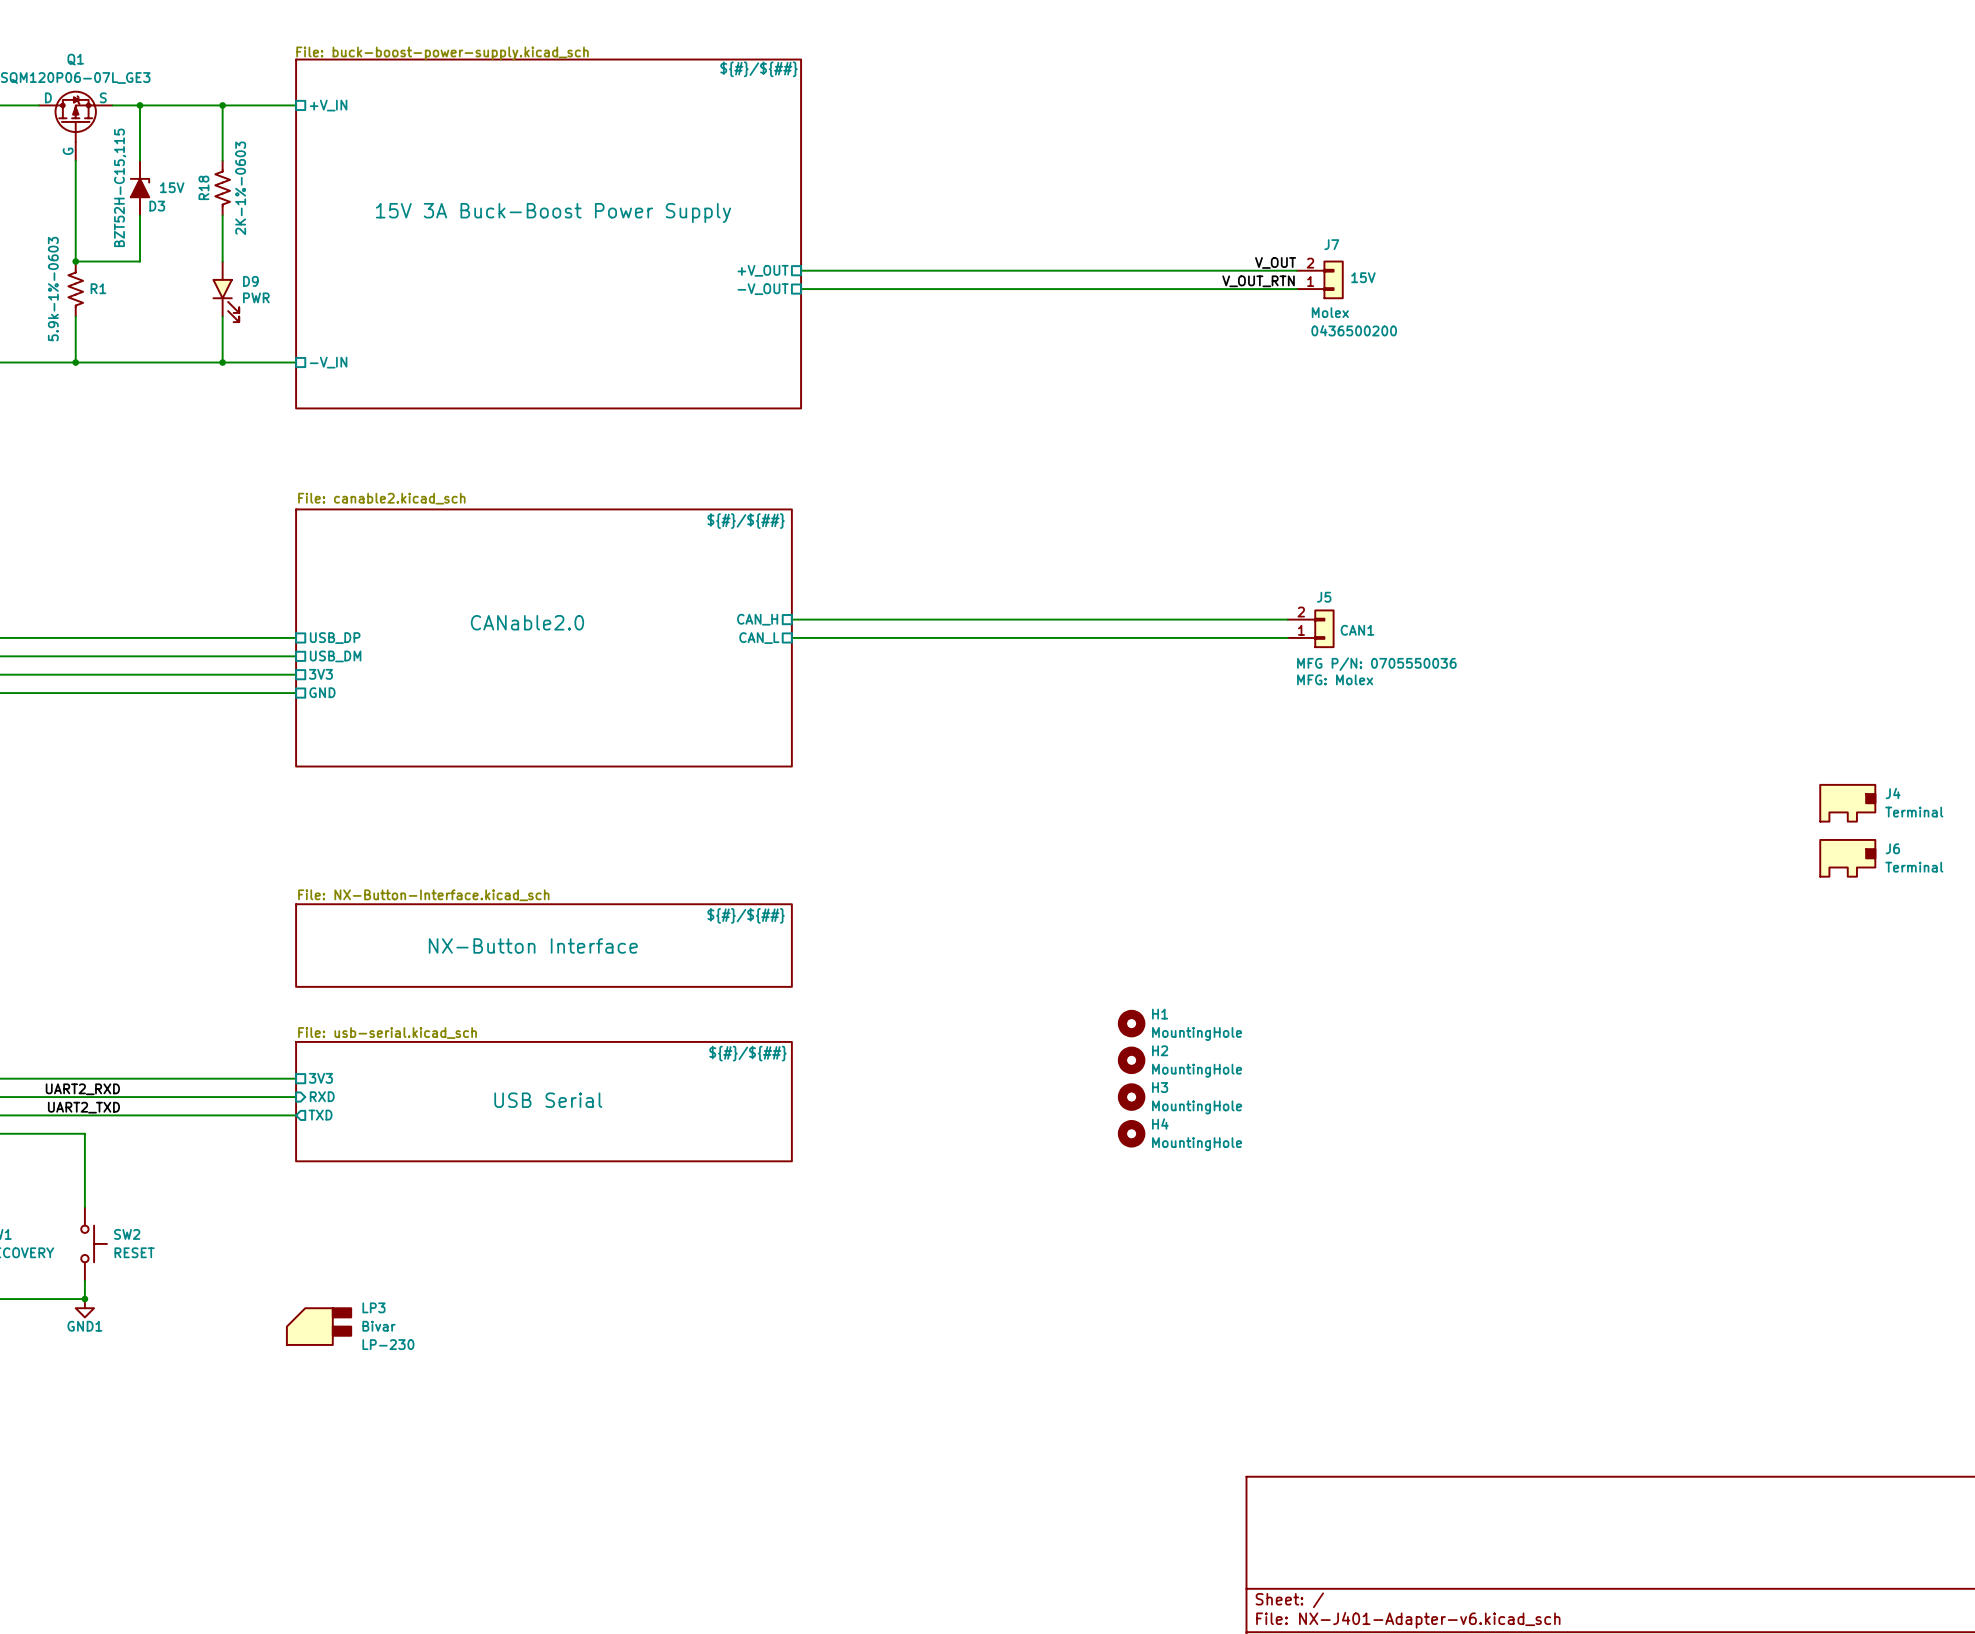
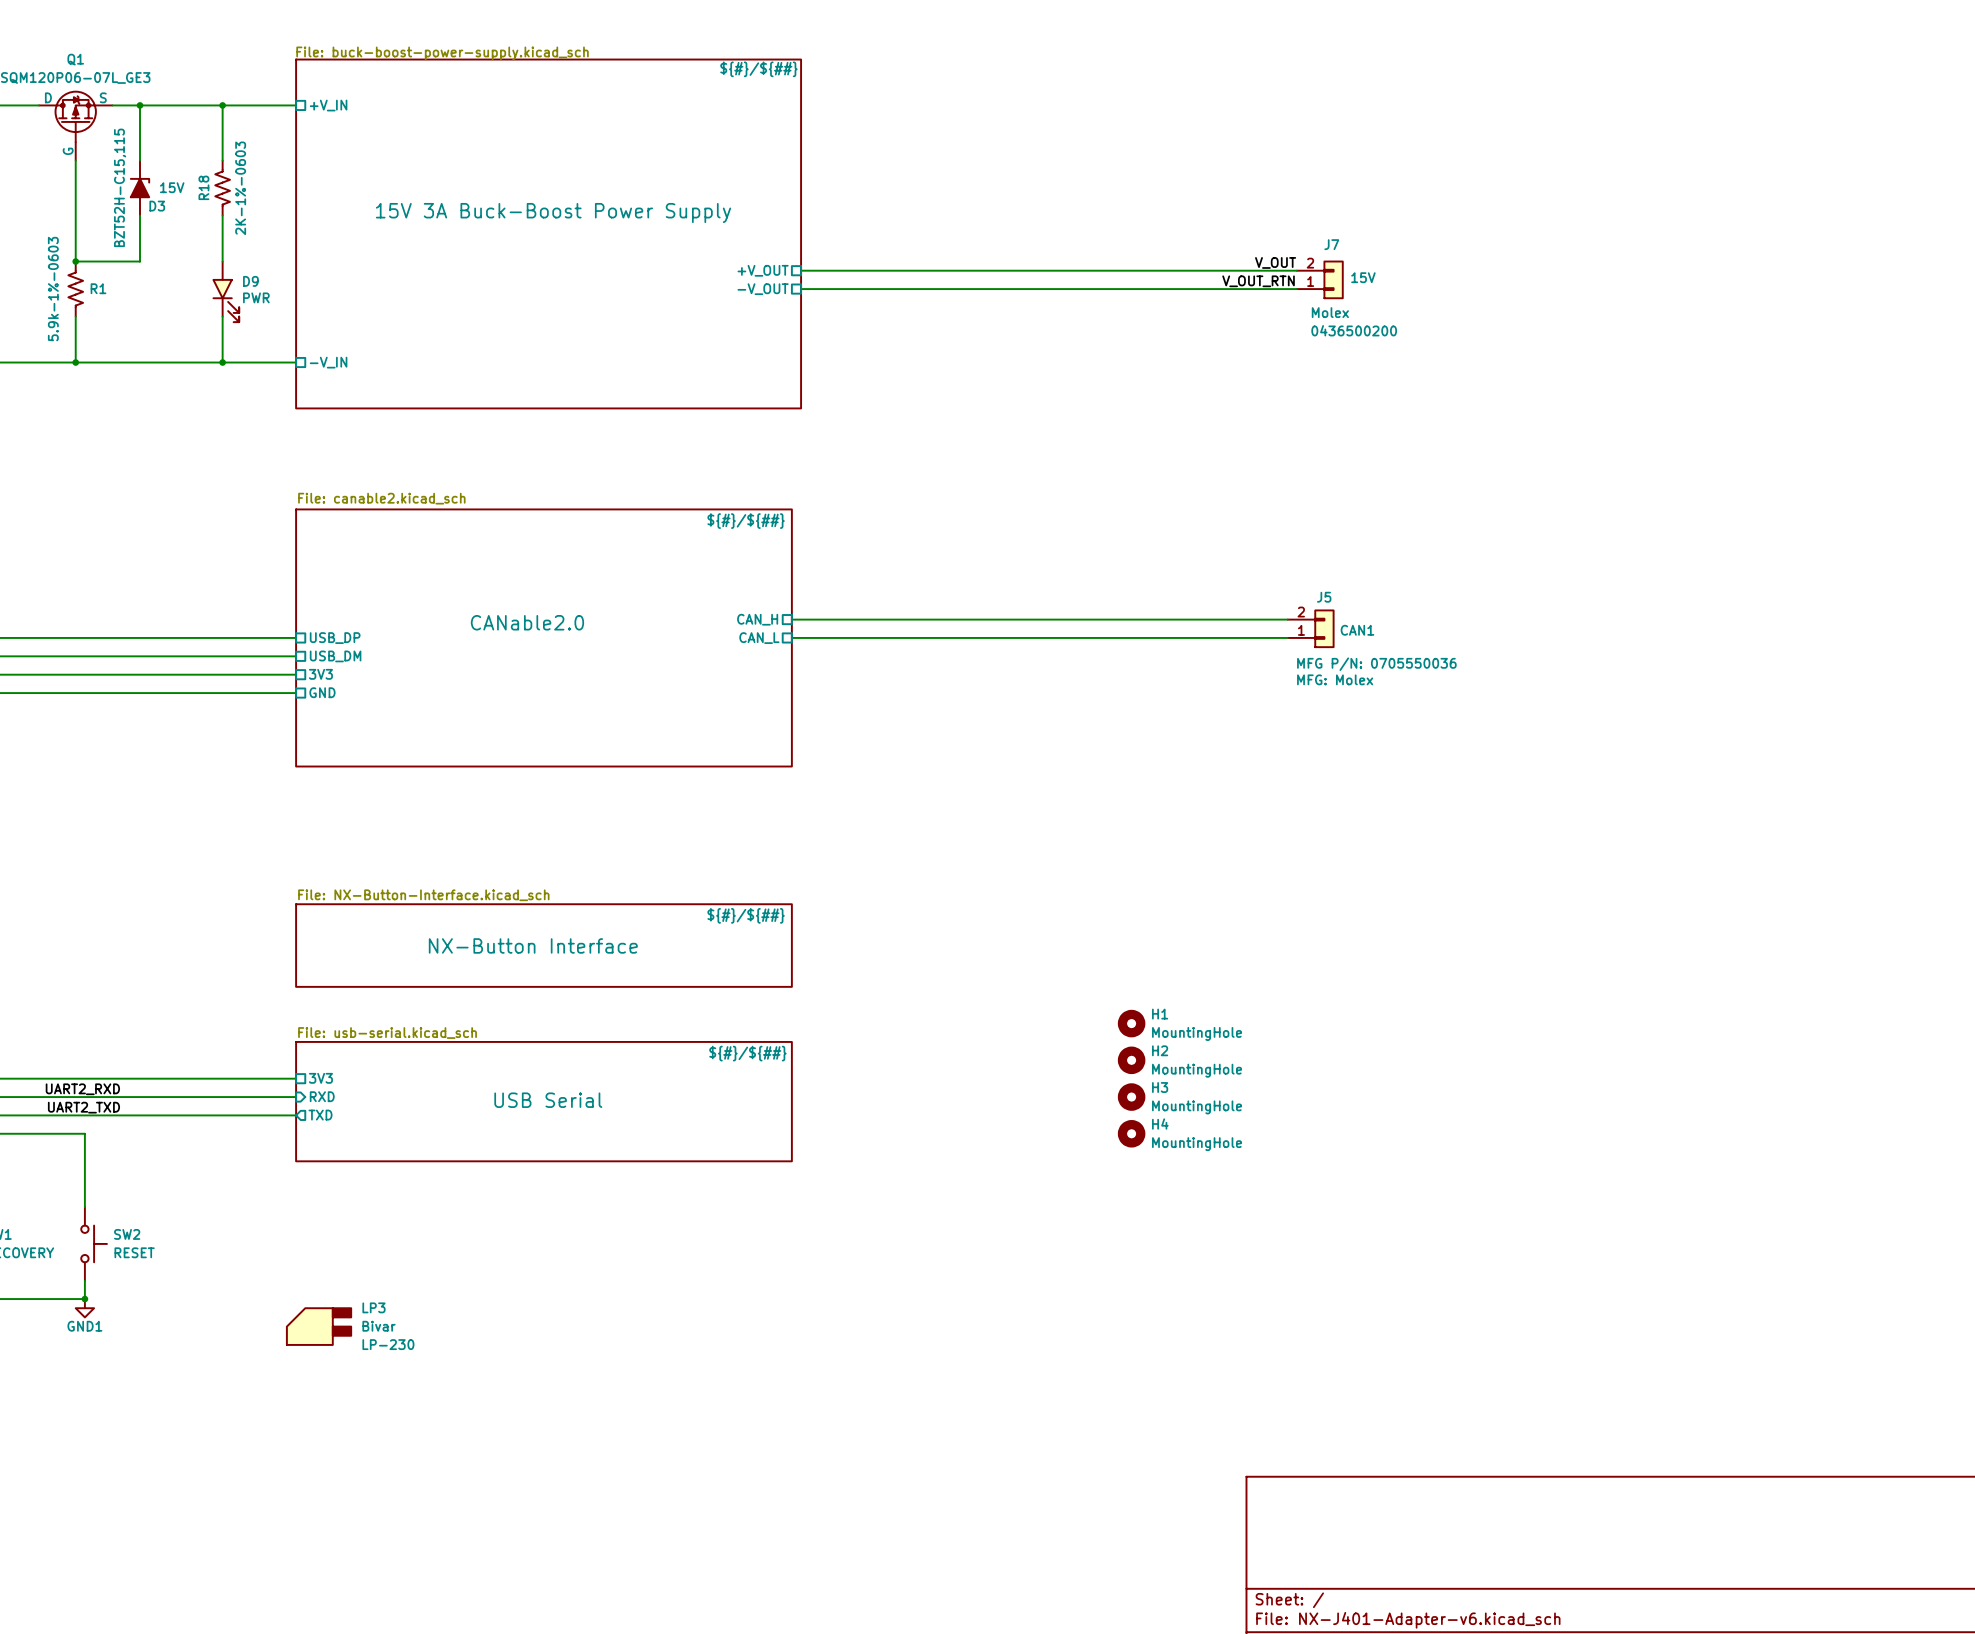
J4: Terminal (1847, 803) -> none
J6: Terminal (1847, 858) -> none

